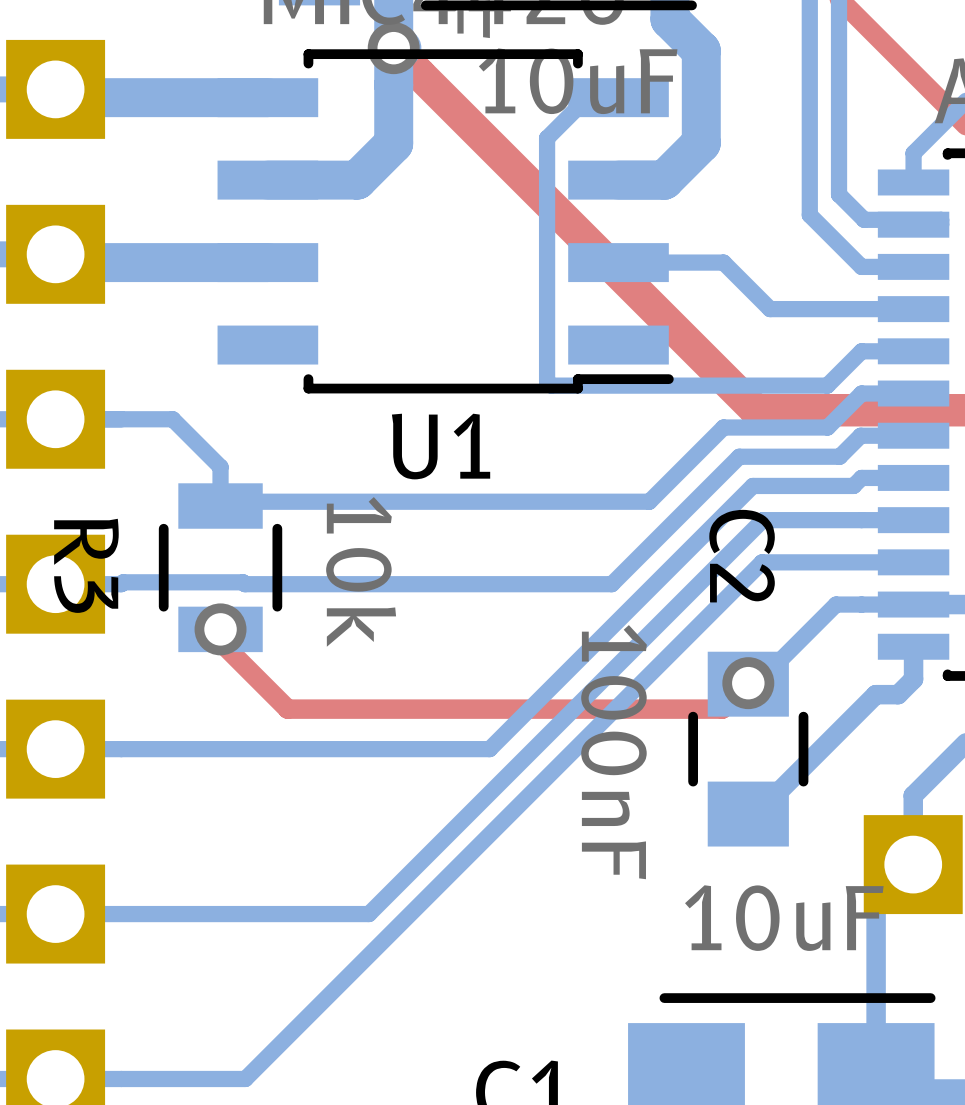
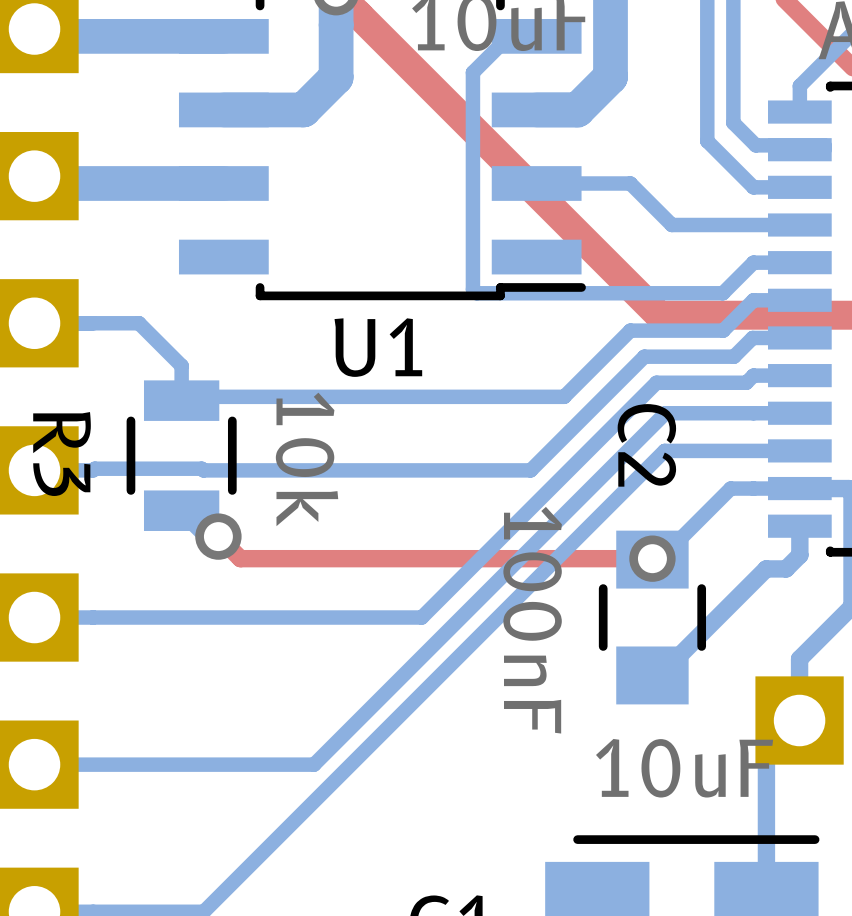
top track: (220, 629) (220, 641) (287, 709) (722, 709) (748, 683) -> (218, 536) (240, 558) (652, 558)
via position: (220, 629) -> (218, 536)

